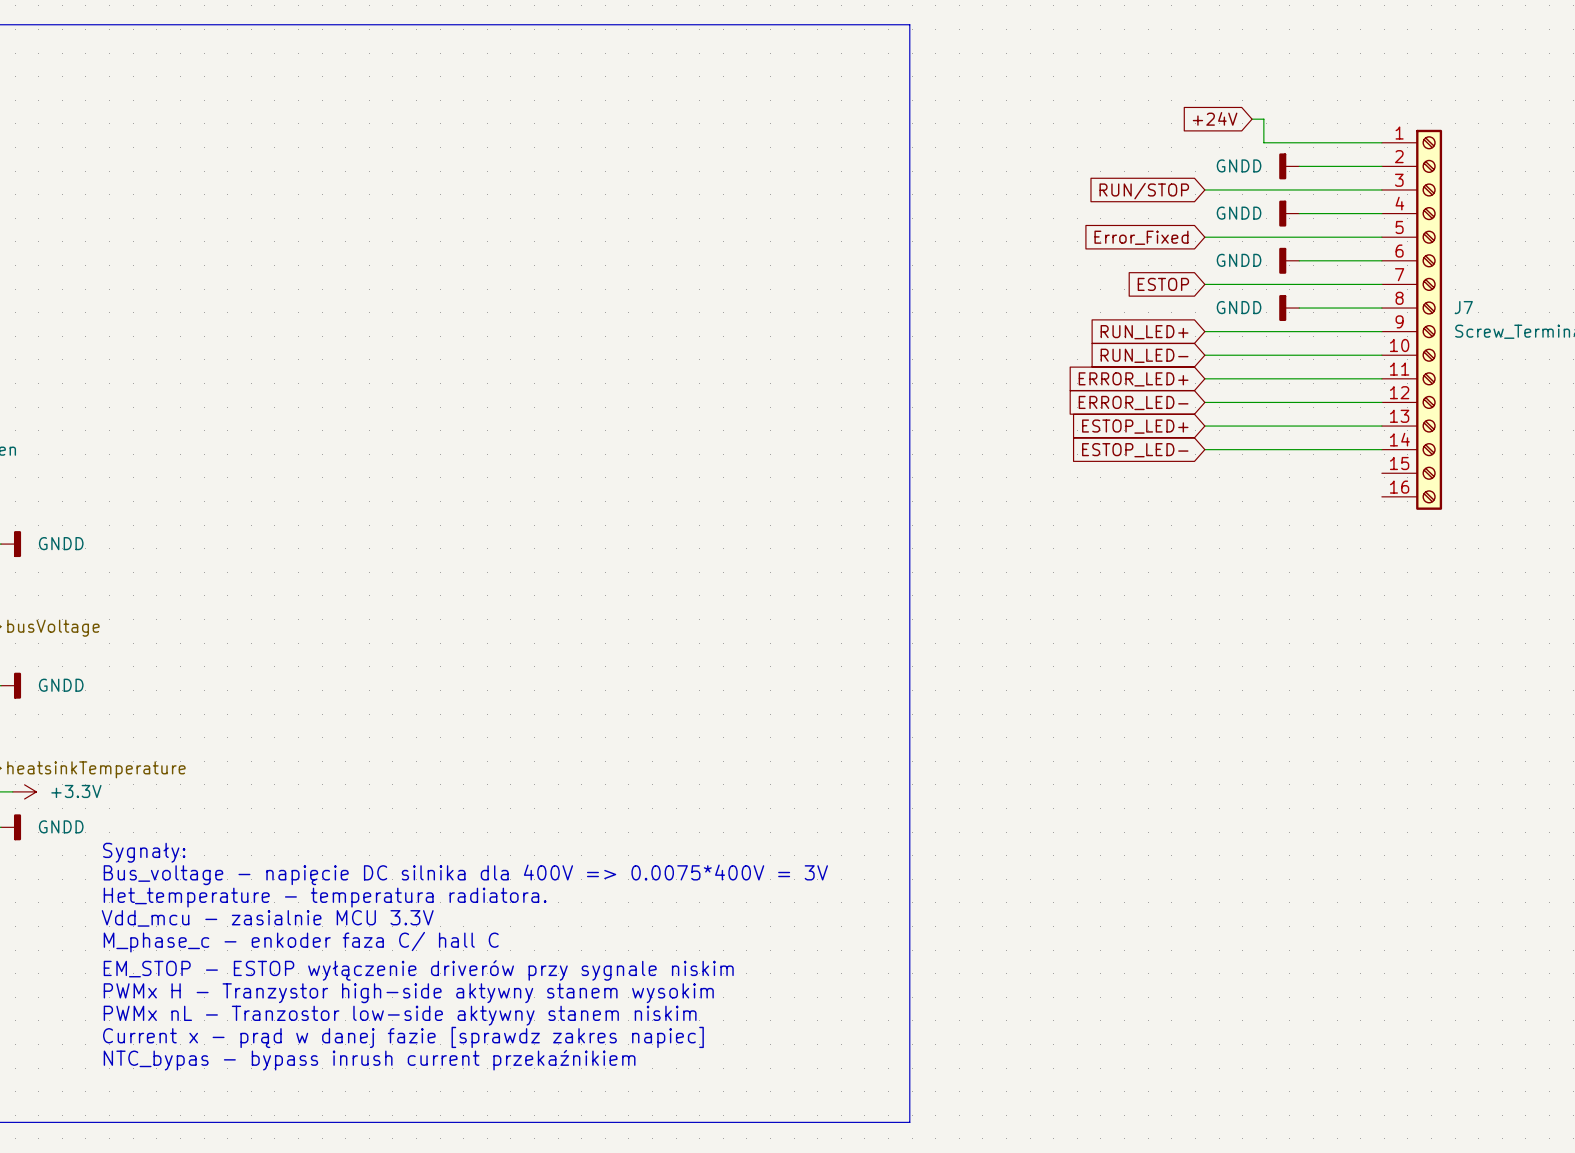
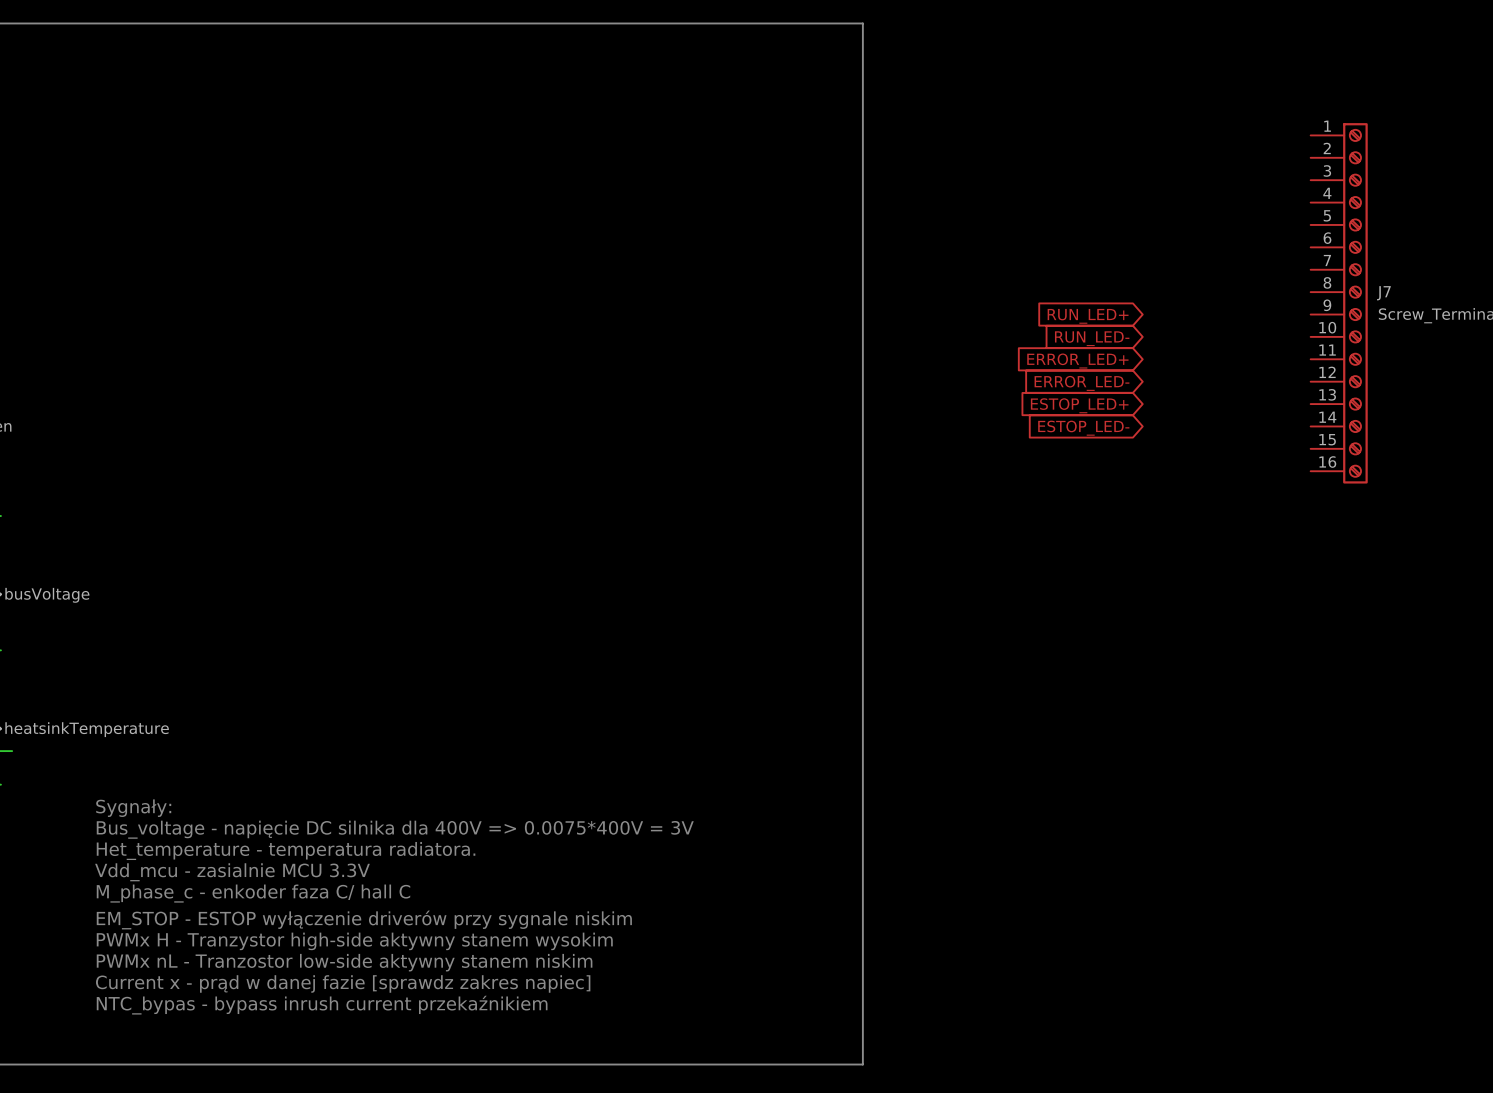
global label: +24V (1215, 118) -> none
wire: (1252, 119) (1263, 119) (1263, 142) (1381, 142) -> none
power symbol: GNDD (1289, 166) -> none
wire: (1299, 166) (1381, 166) -> none
wire: (1204, 189) (1381, 189) -> none
global label: RUN/STOP (1144, 191) -> none
power symbol: GNDD (1289, 213) -> none
wire: (1299, 213) (1381, 213) -> none
global label: Error_Fixed (1141, 237) -> none
wire: (1204, 237) (1381, 237) -> none
power symbol: GNDD (1289, 260) -> none
wire: (1299, 260) (1381, 260) -> none
global label: ESTOP (1163, 284) -> none
wire: (1204, 284) (1381, 284) -> none
power symbol: GNDD (1289, 308) -> none
wire: (1299, 308) (1381, 308) -> none
wire: (1204, 331) (1381, 331) -> none
wire: (1204, 355) (1381, 355) -> none
wire: (1204, 378) (1381, 378) -> none
wire: (1204, 402) (1381, 402) -> none
wire: (1204, 426) (1381, 426) -> none
wire: (1204, 449) (1381, 449) -> none
power symbol: GNDD (11, 544) -> none
power symbol: GNDD (11, 685) -> none
power symbol: +3.3V (24, 791) -> none
power symbol: GNDD (11, 827) -> none

